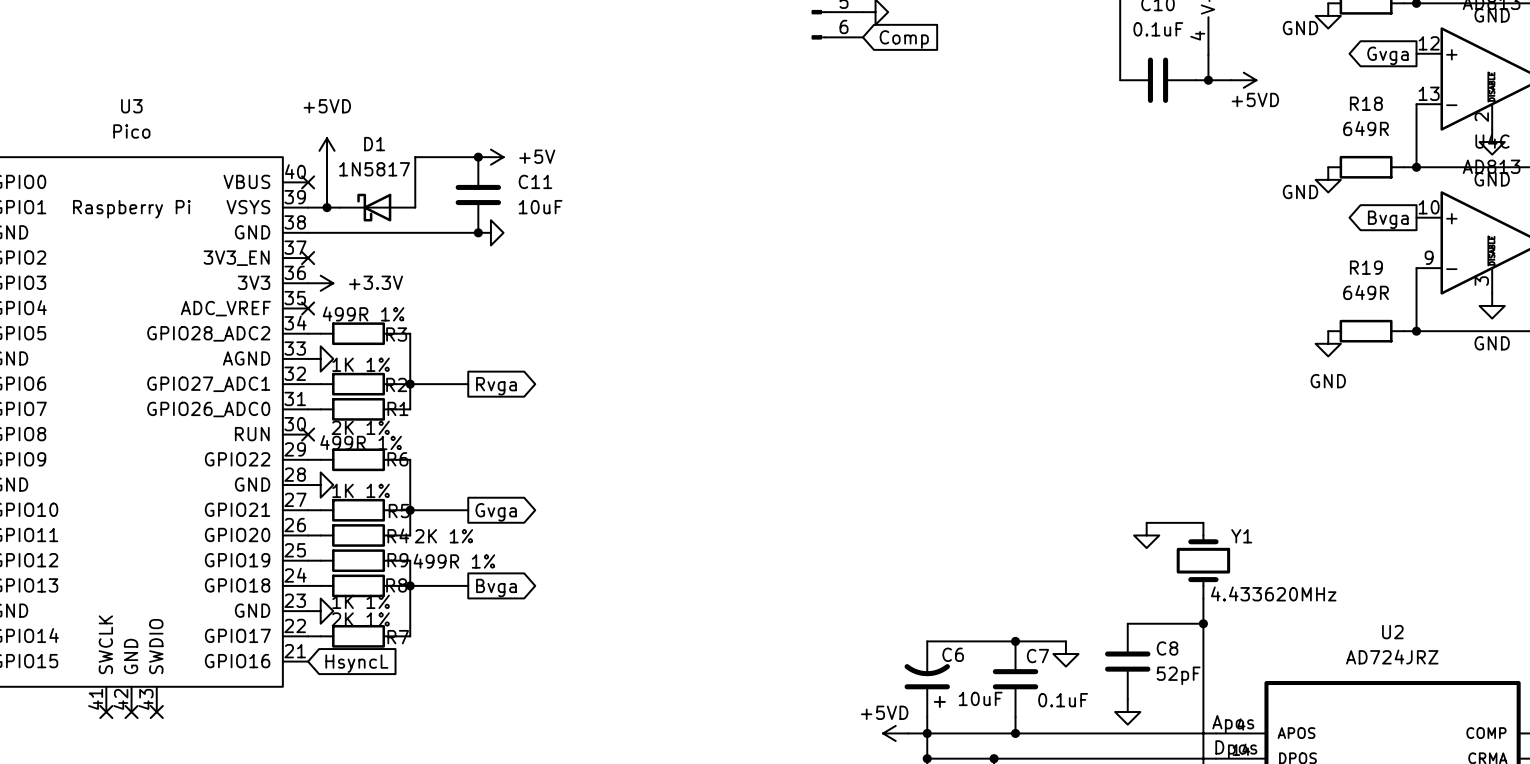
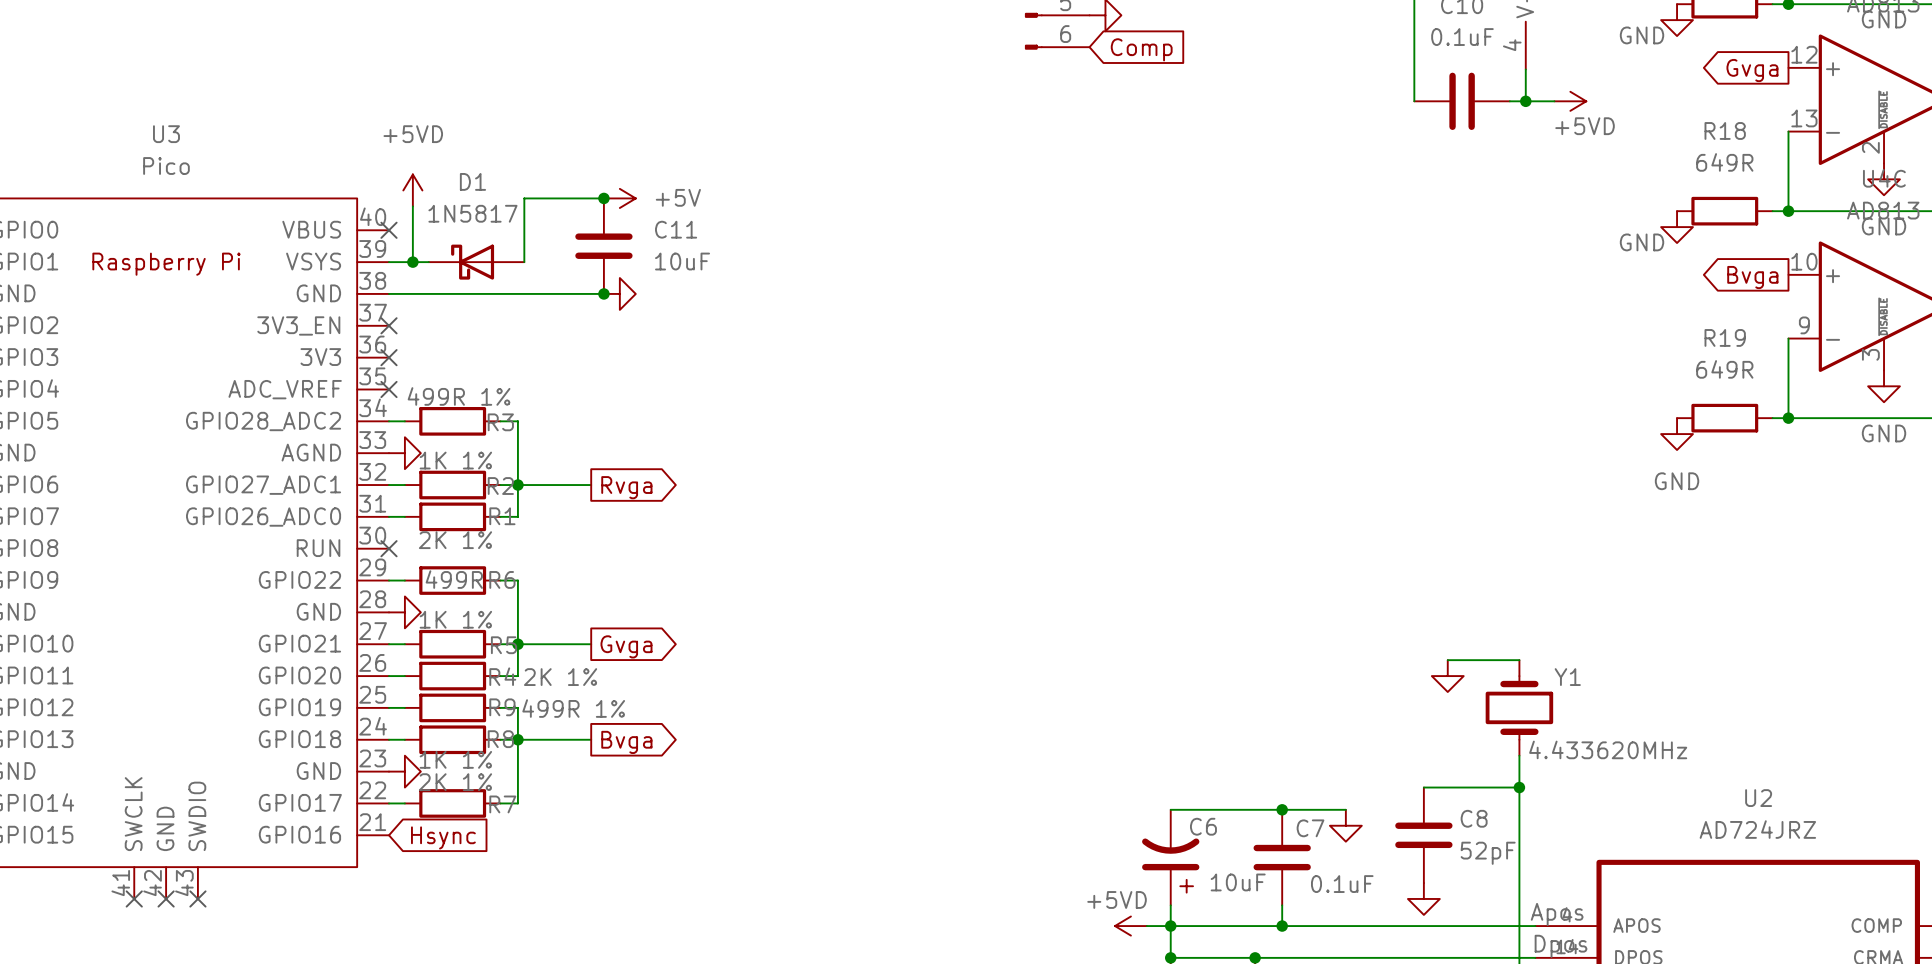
no-connect mark: none -> (388, 357)
power symbol: +3.3V (320, 283) -> none
R6 value: 499R 1% (361, 442) -> 499R (454, 579)
global label: HsyncL (356, 663) -> Hsync (443, 837)

